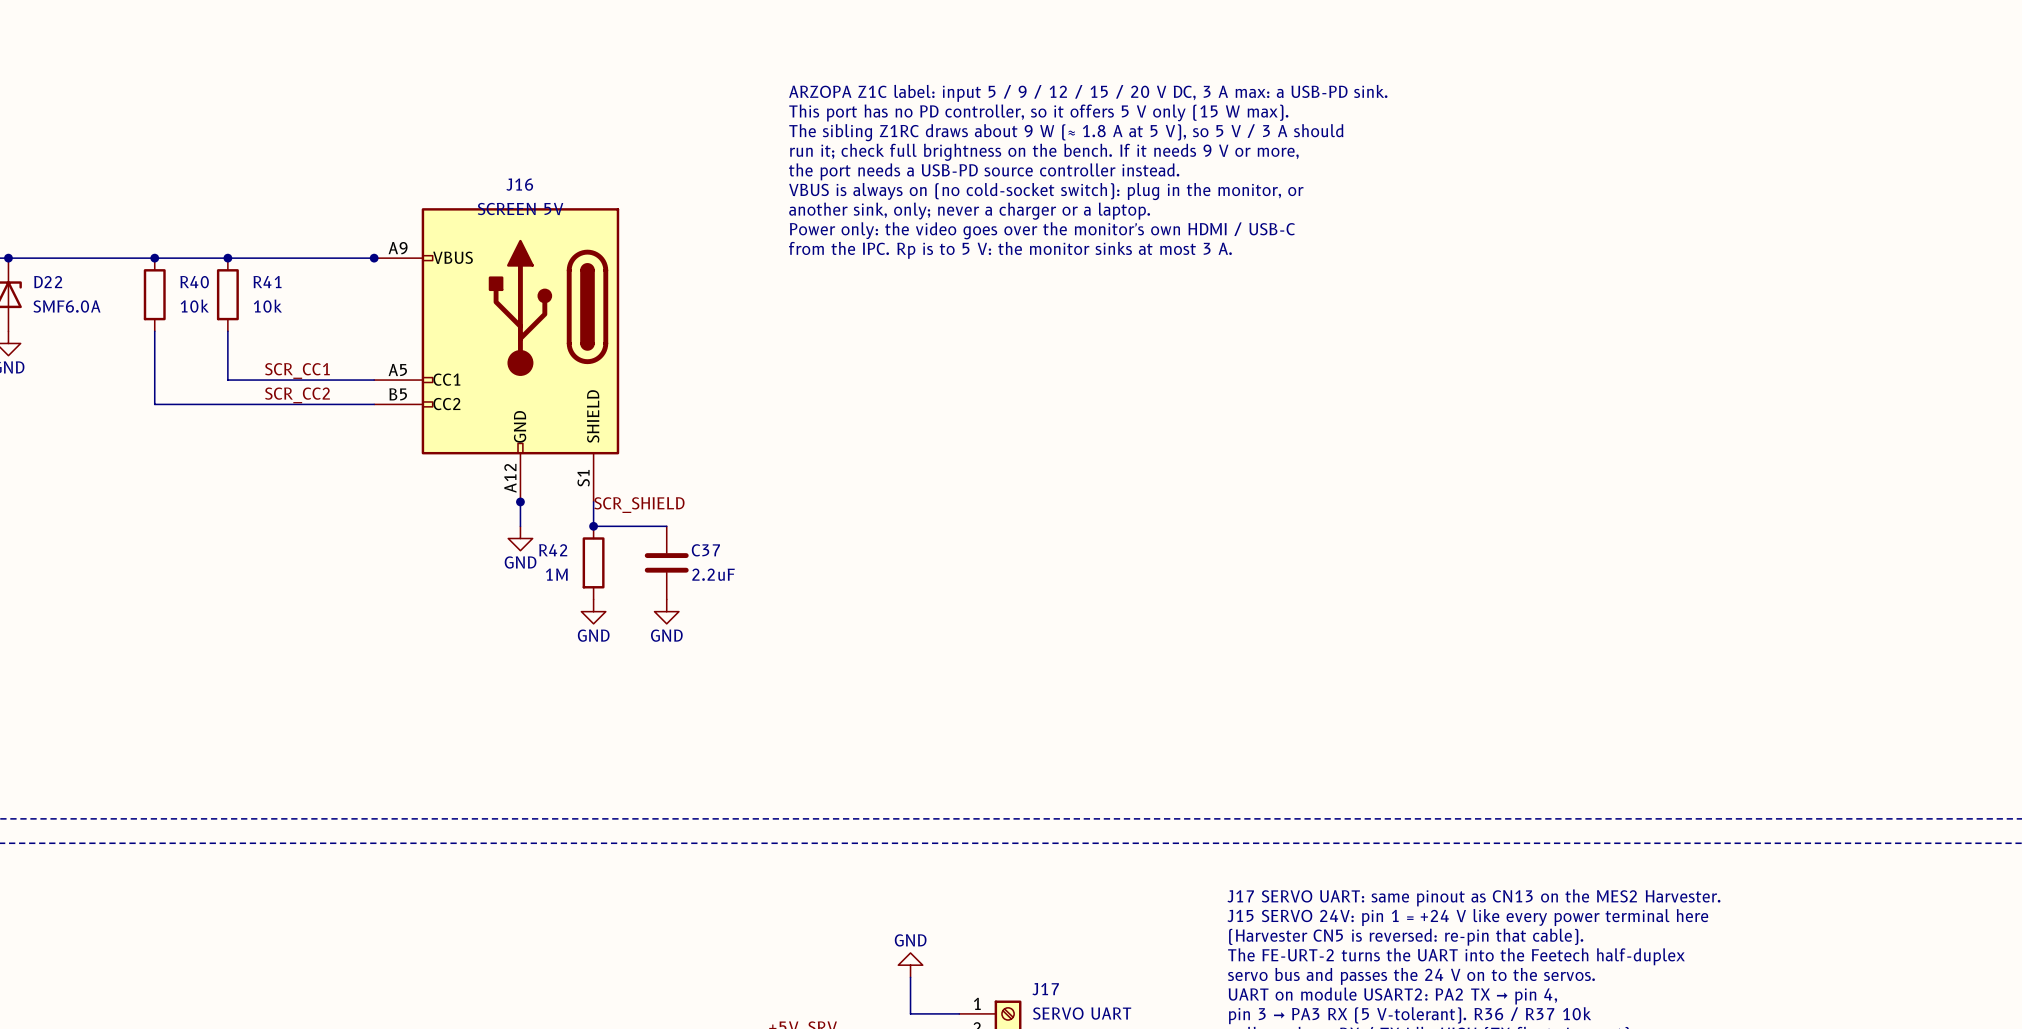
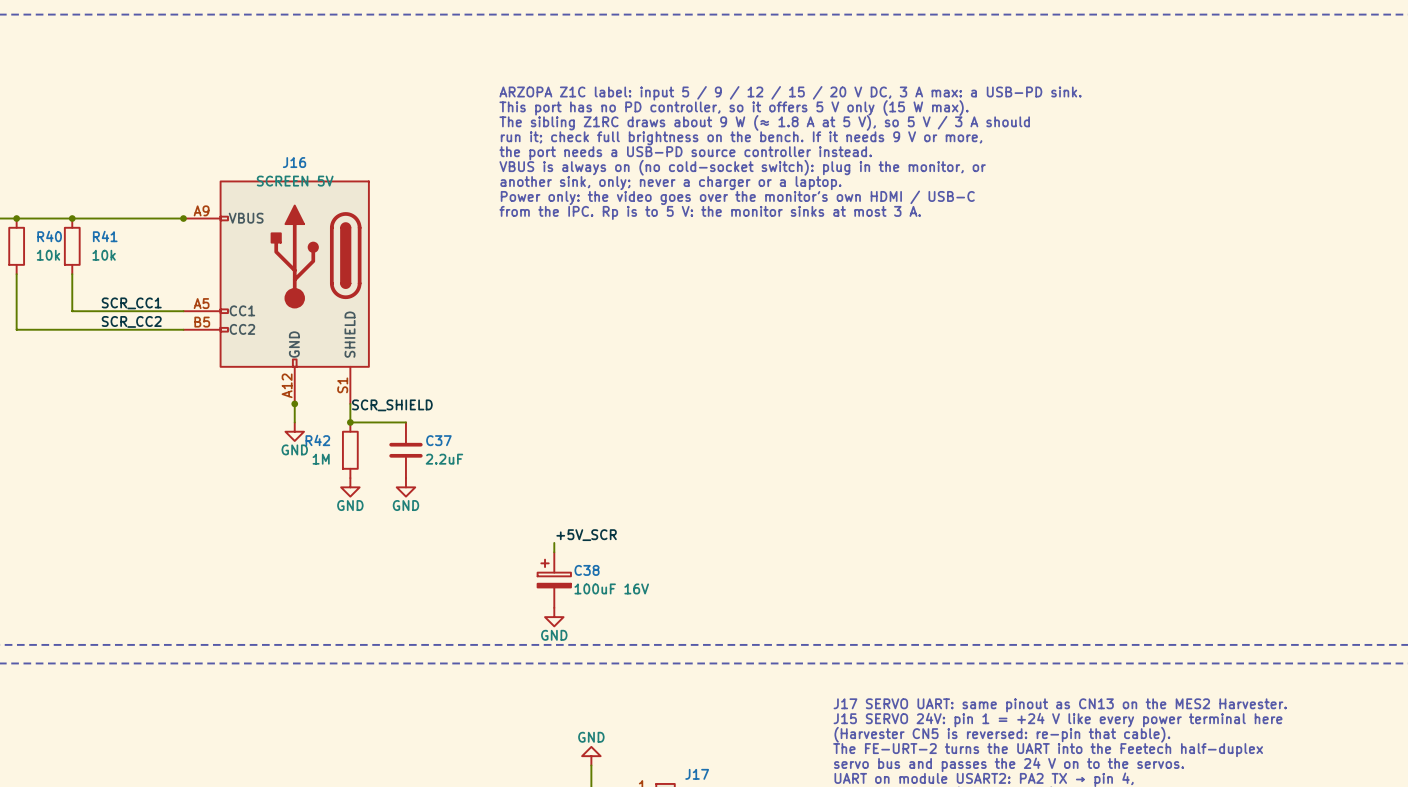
label: none -> +5V_SCR (586, 535)
wire: none -> (554, 542) (554, 552)
C38: none -> 100uF 16V (554, 580)
power symbol: none -> GND (554, 617)

